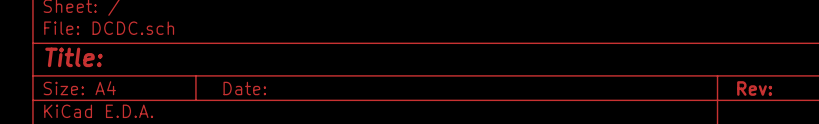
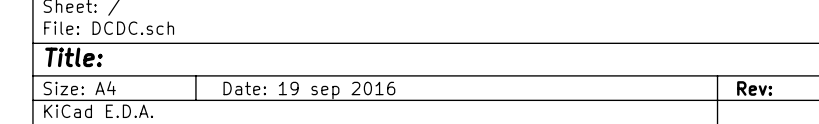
title block: Date: (244, 88) -> Date: 19 sep 2016 (309, 90)

